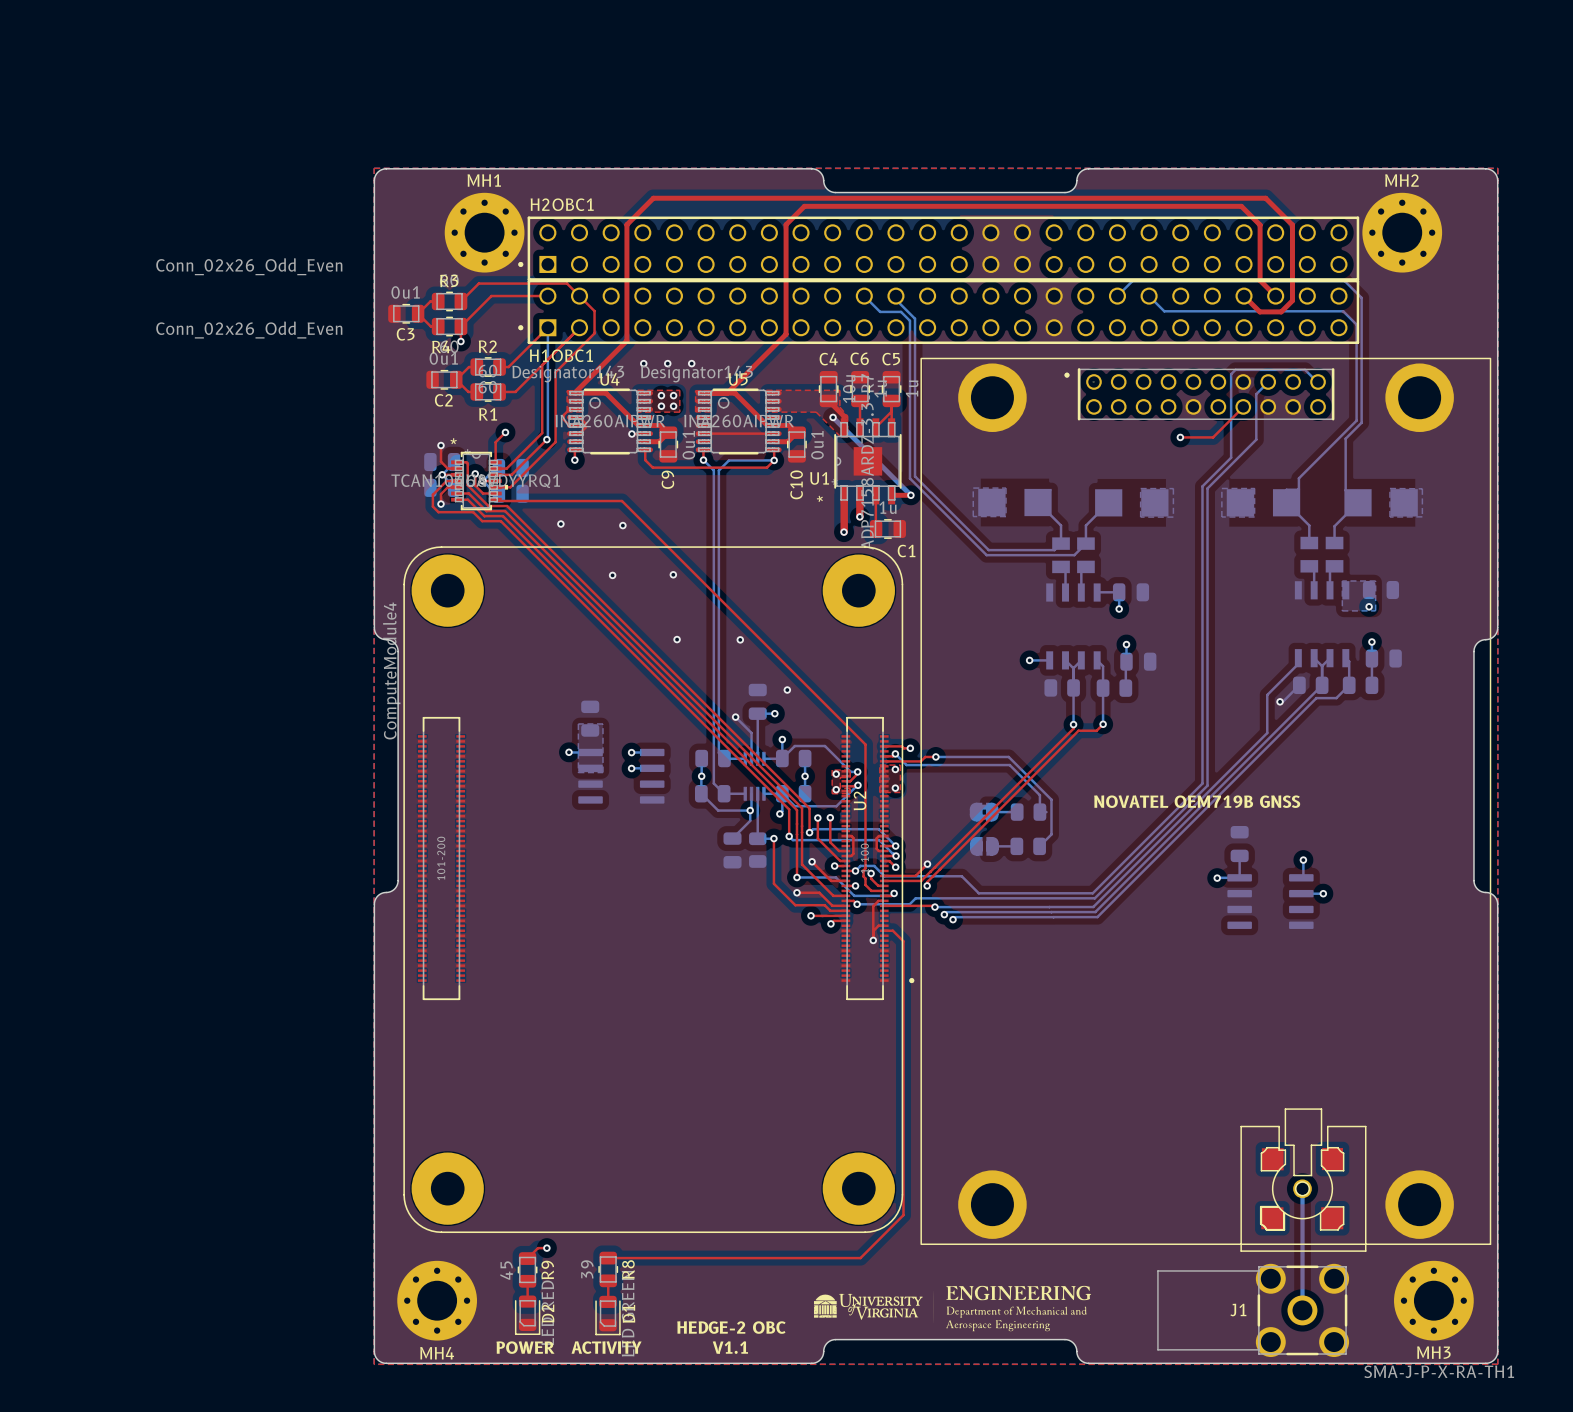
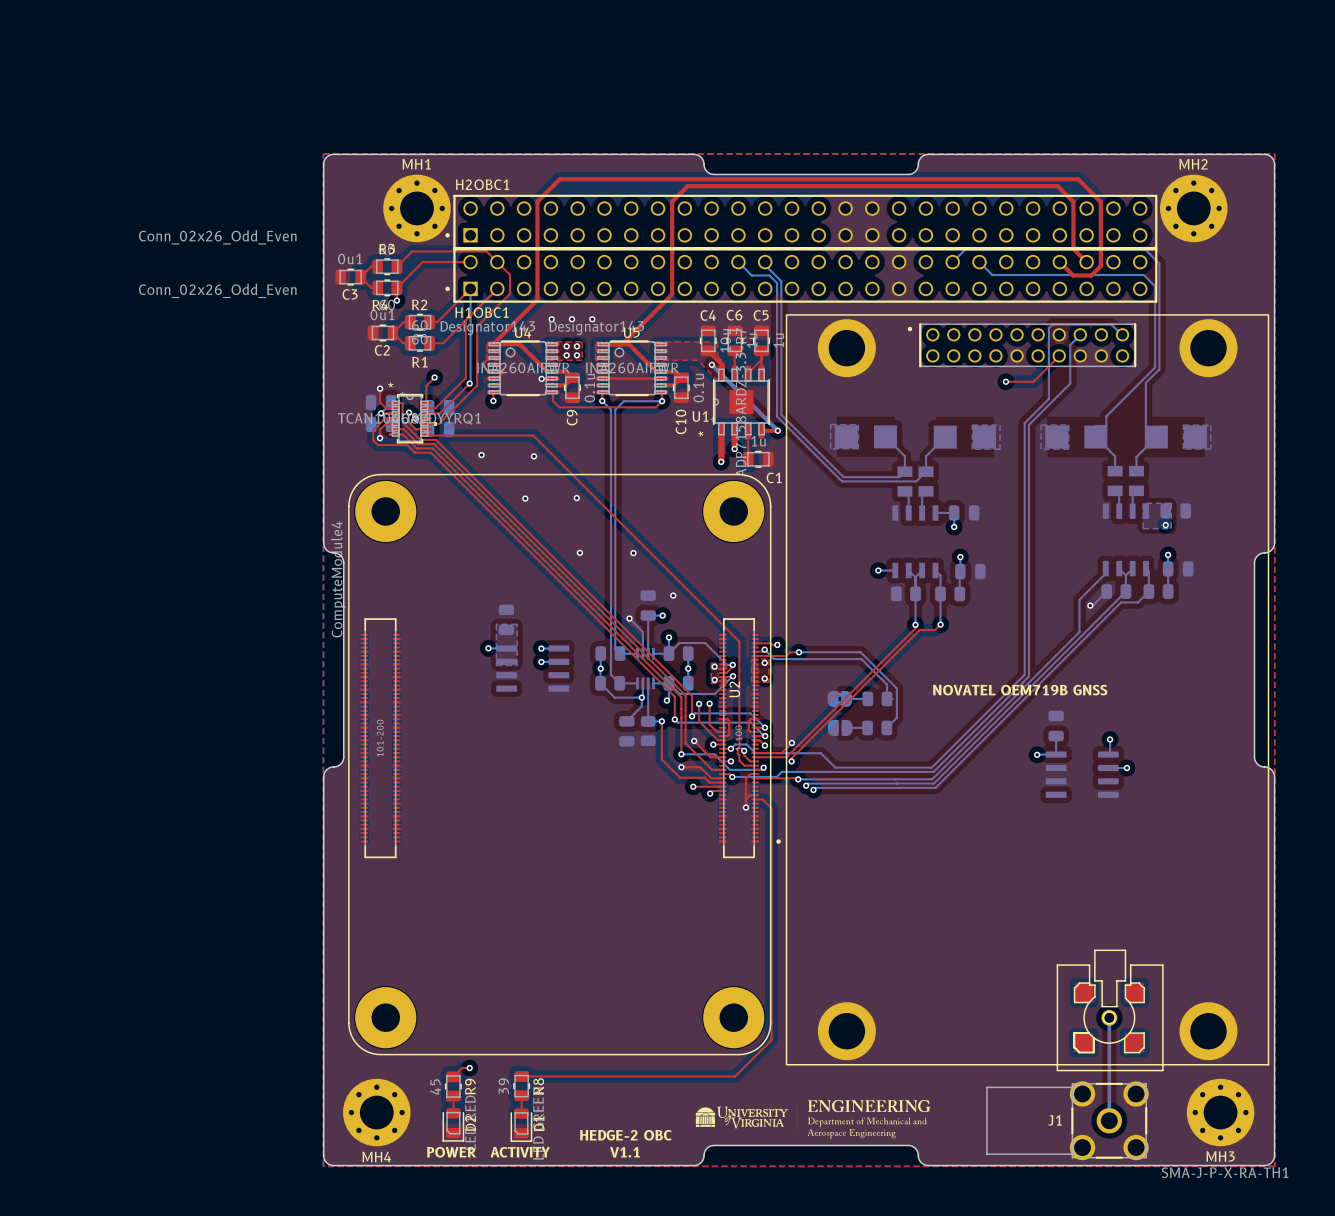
C9 value: 0u1 (688, 445) -> 0.1u (589, 388)
C10 value: 0u1 (817, 445) -> 0.1u (698, 388)

